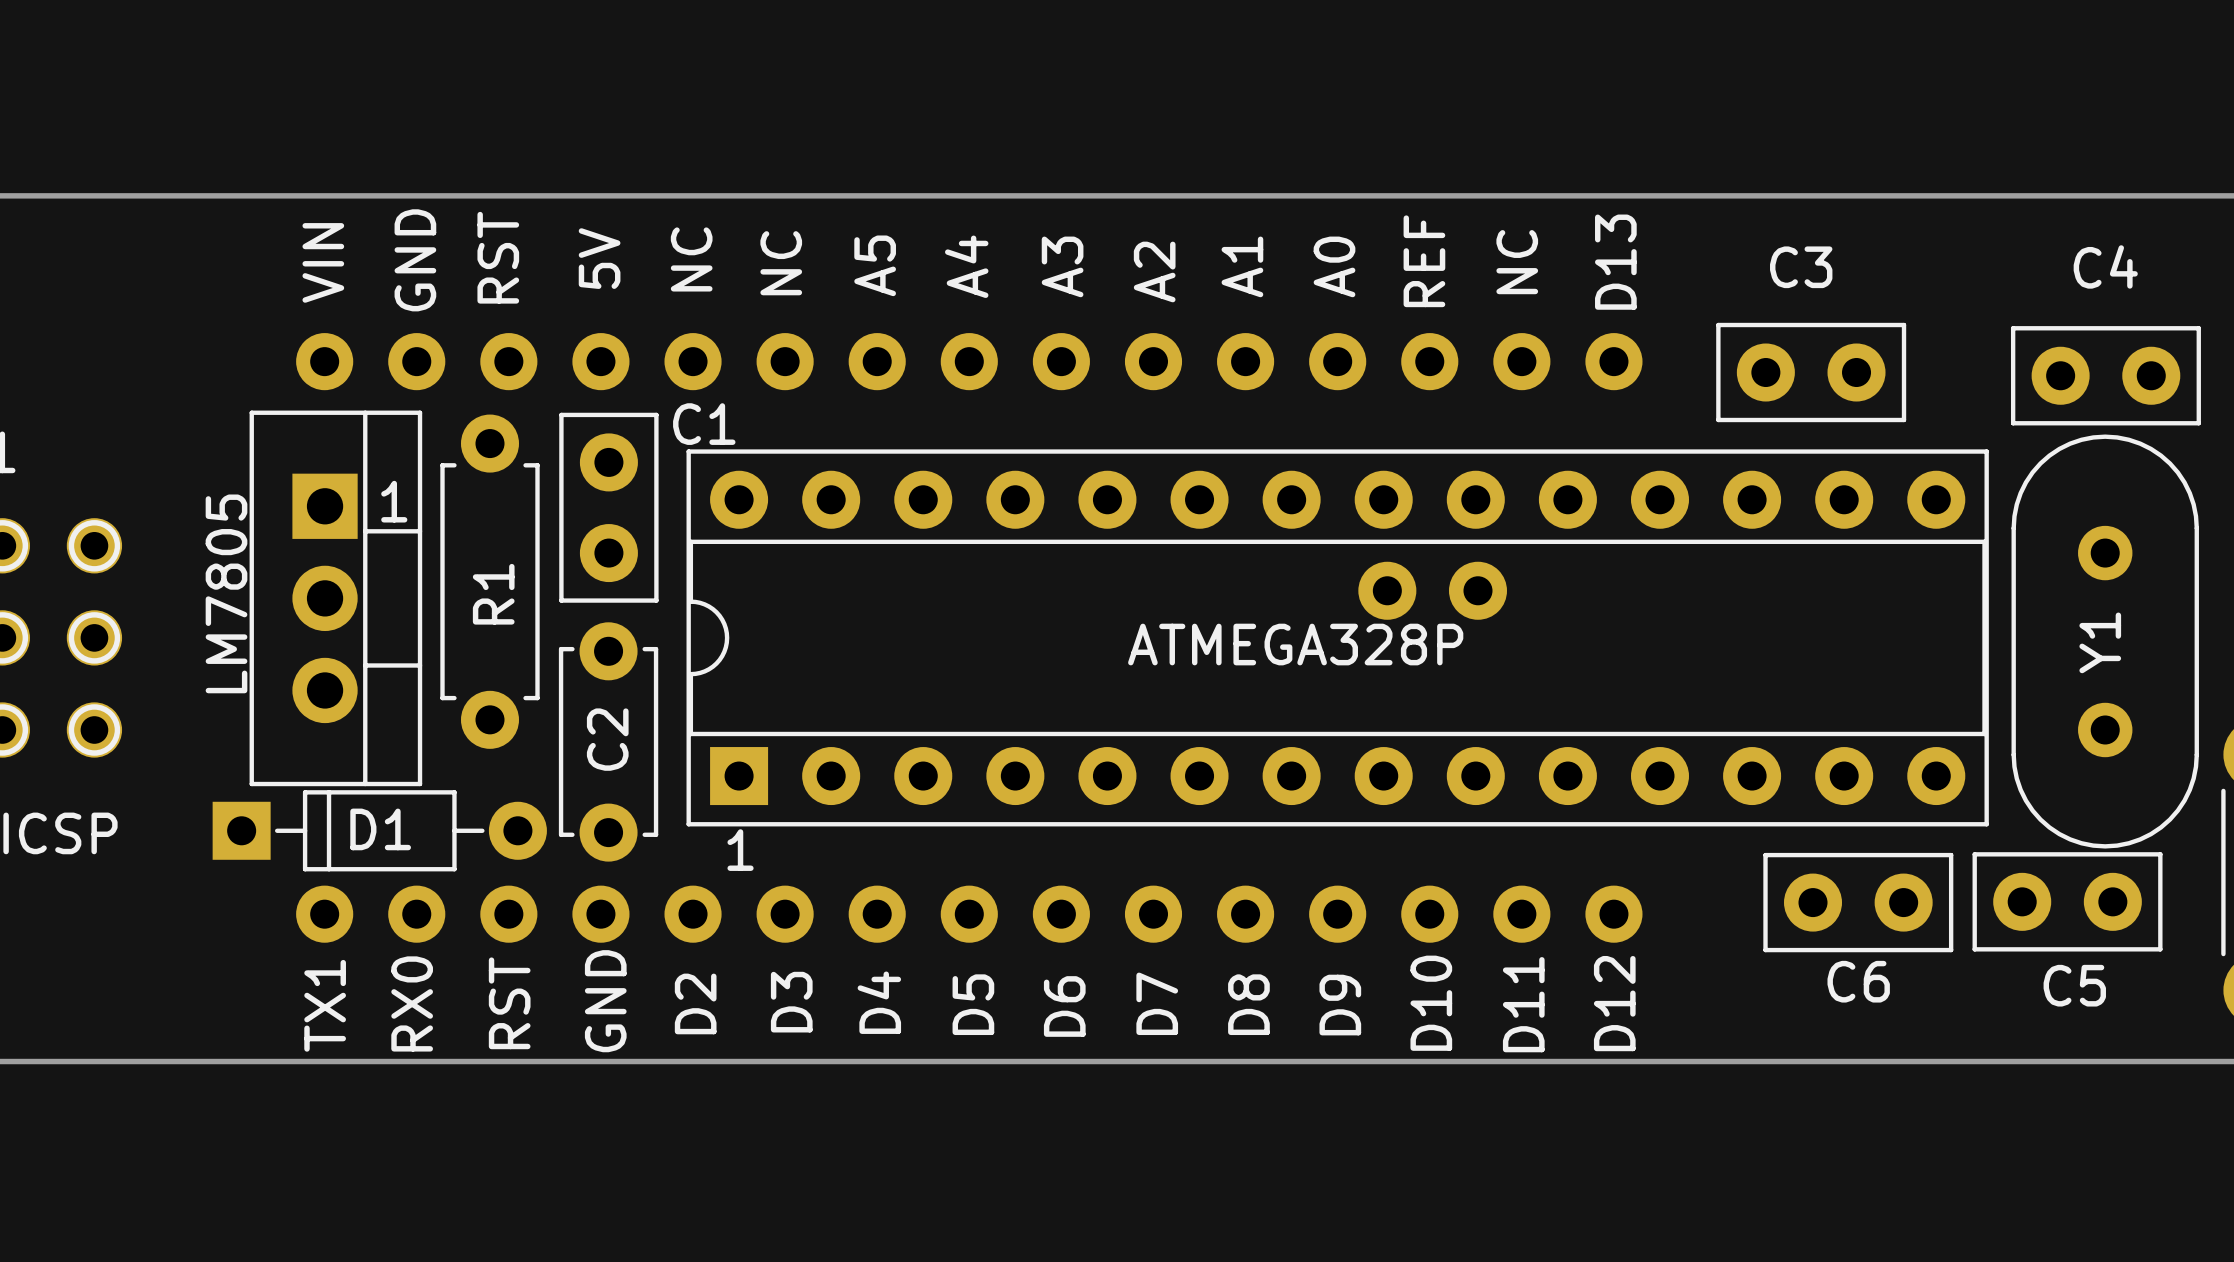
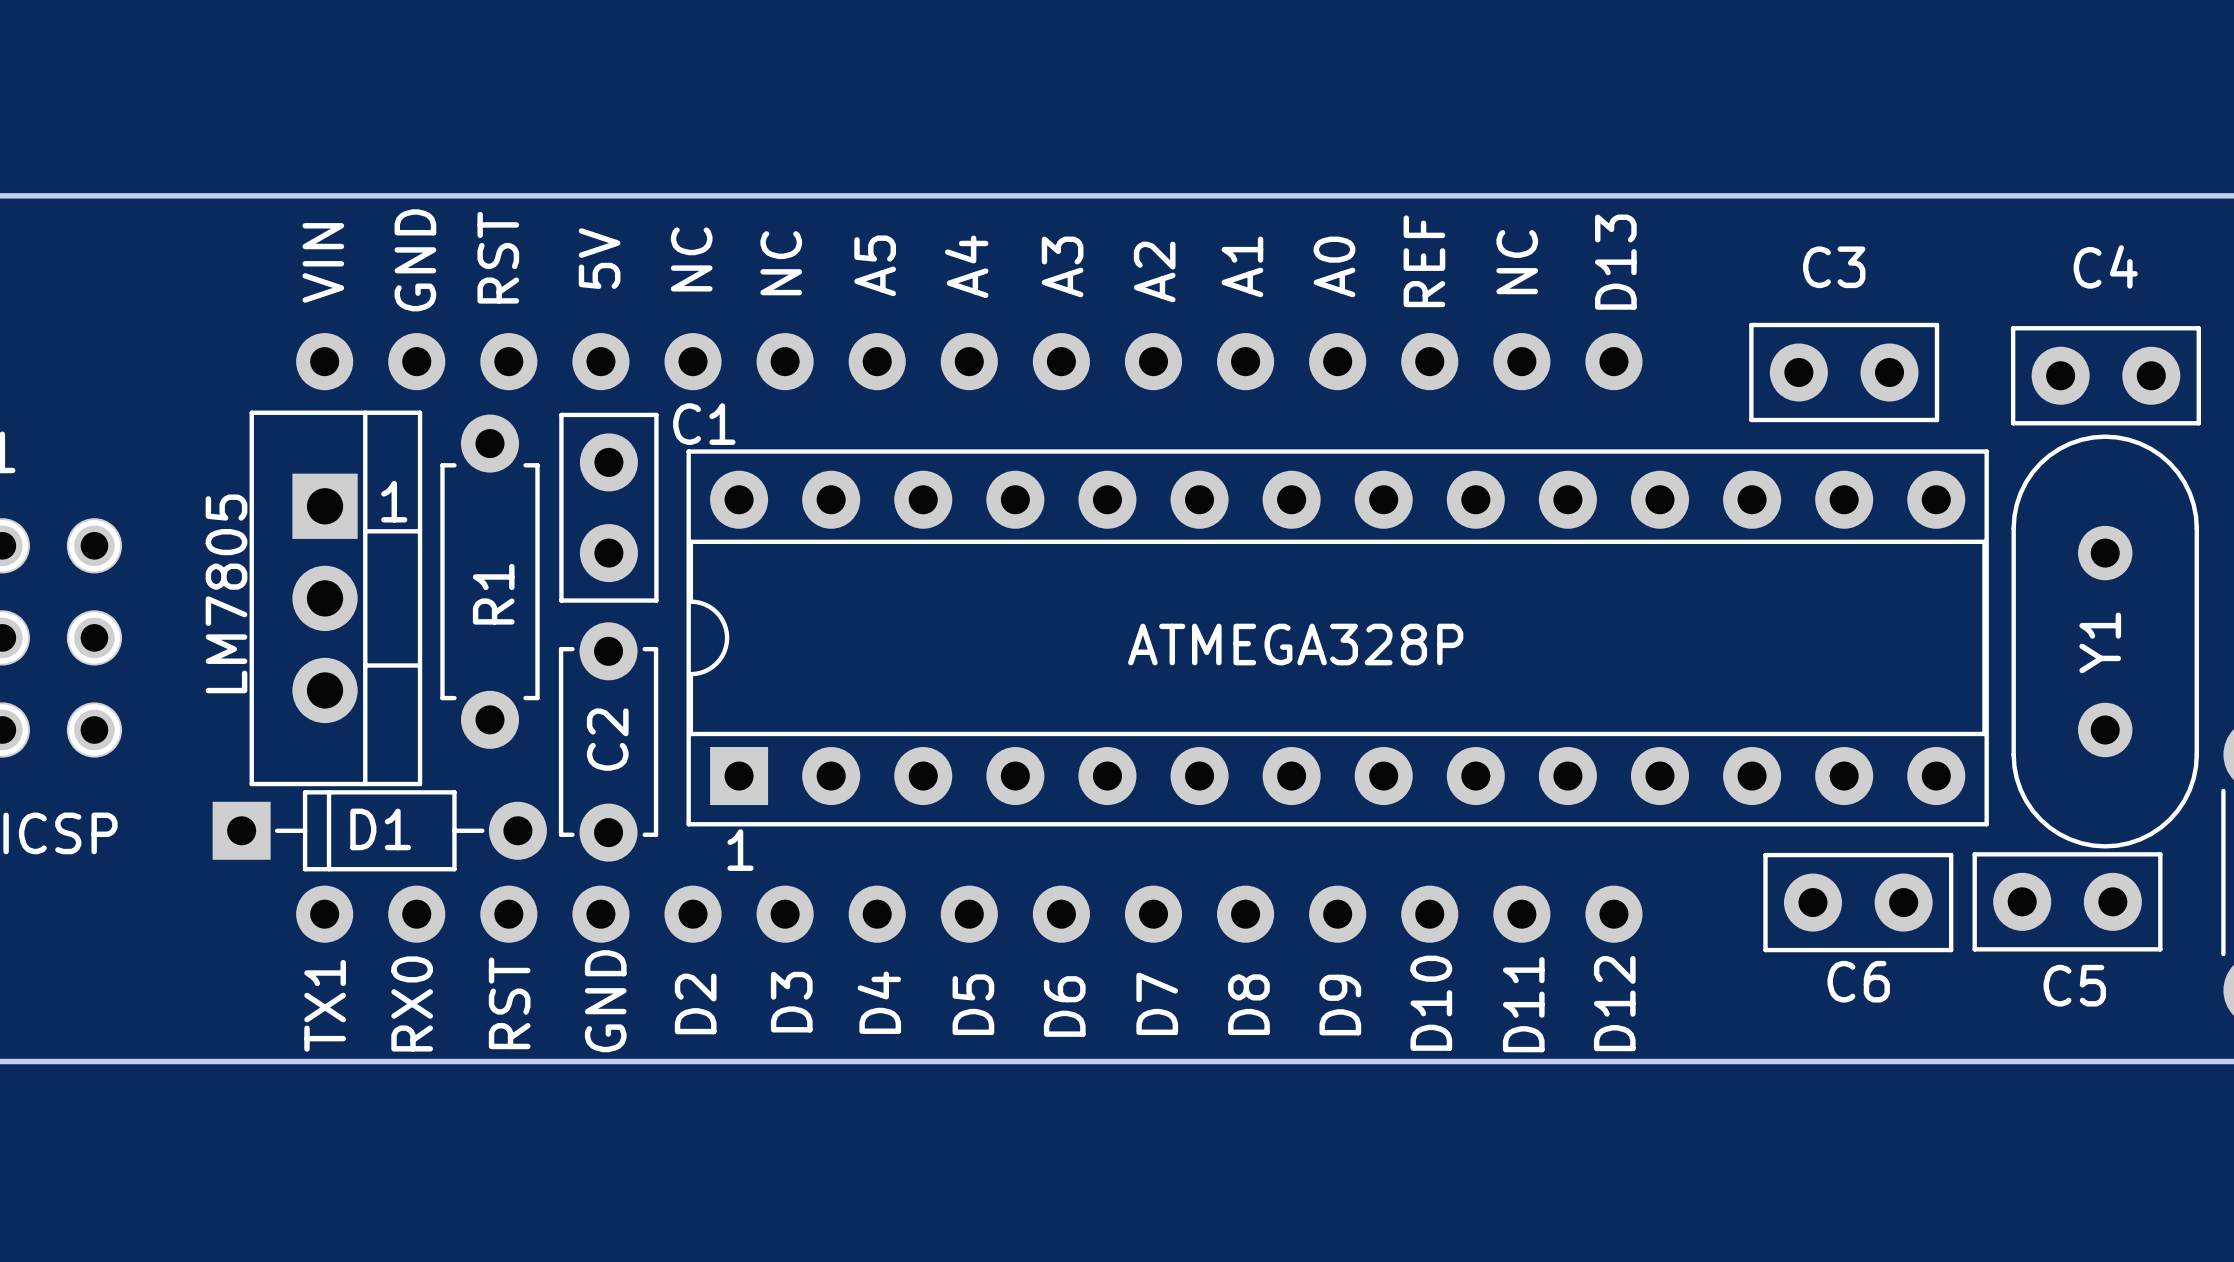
C3 position: (1811, 372) -> (1844, 372)
part: (1432, 590) -> none

